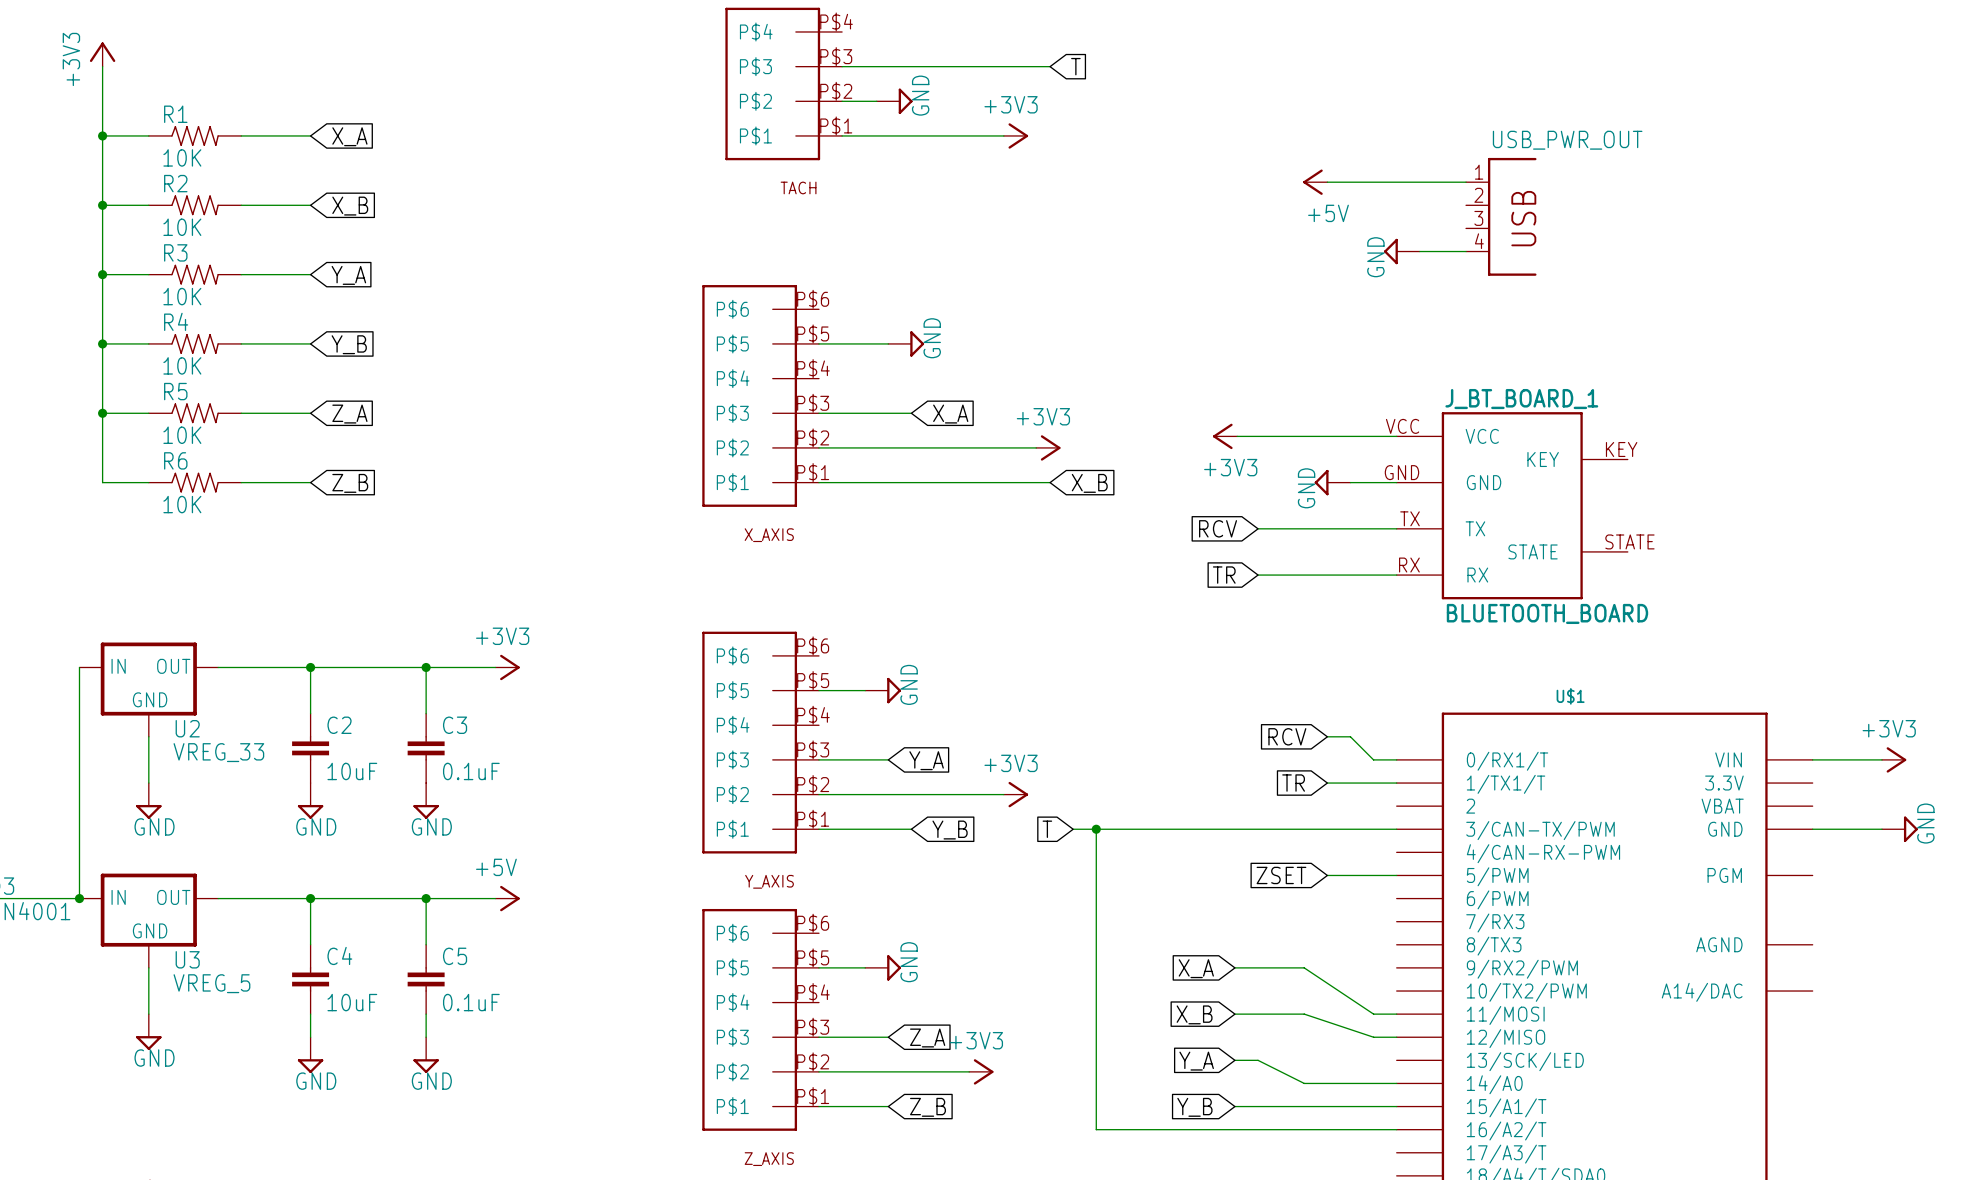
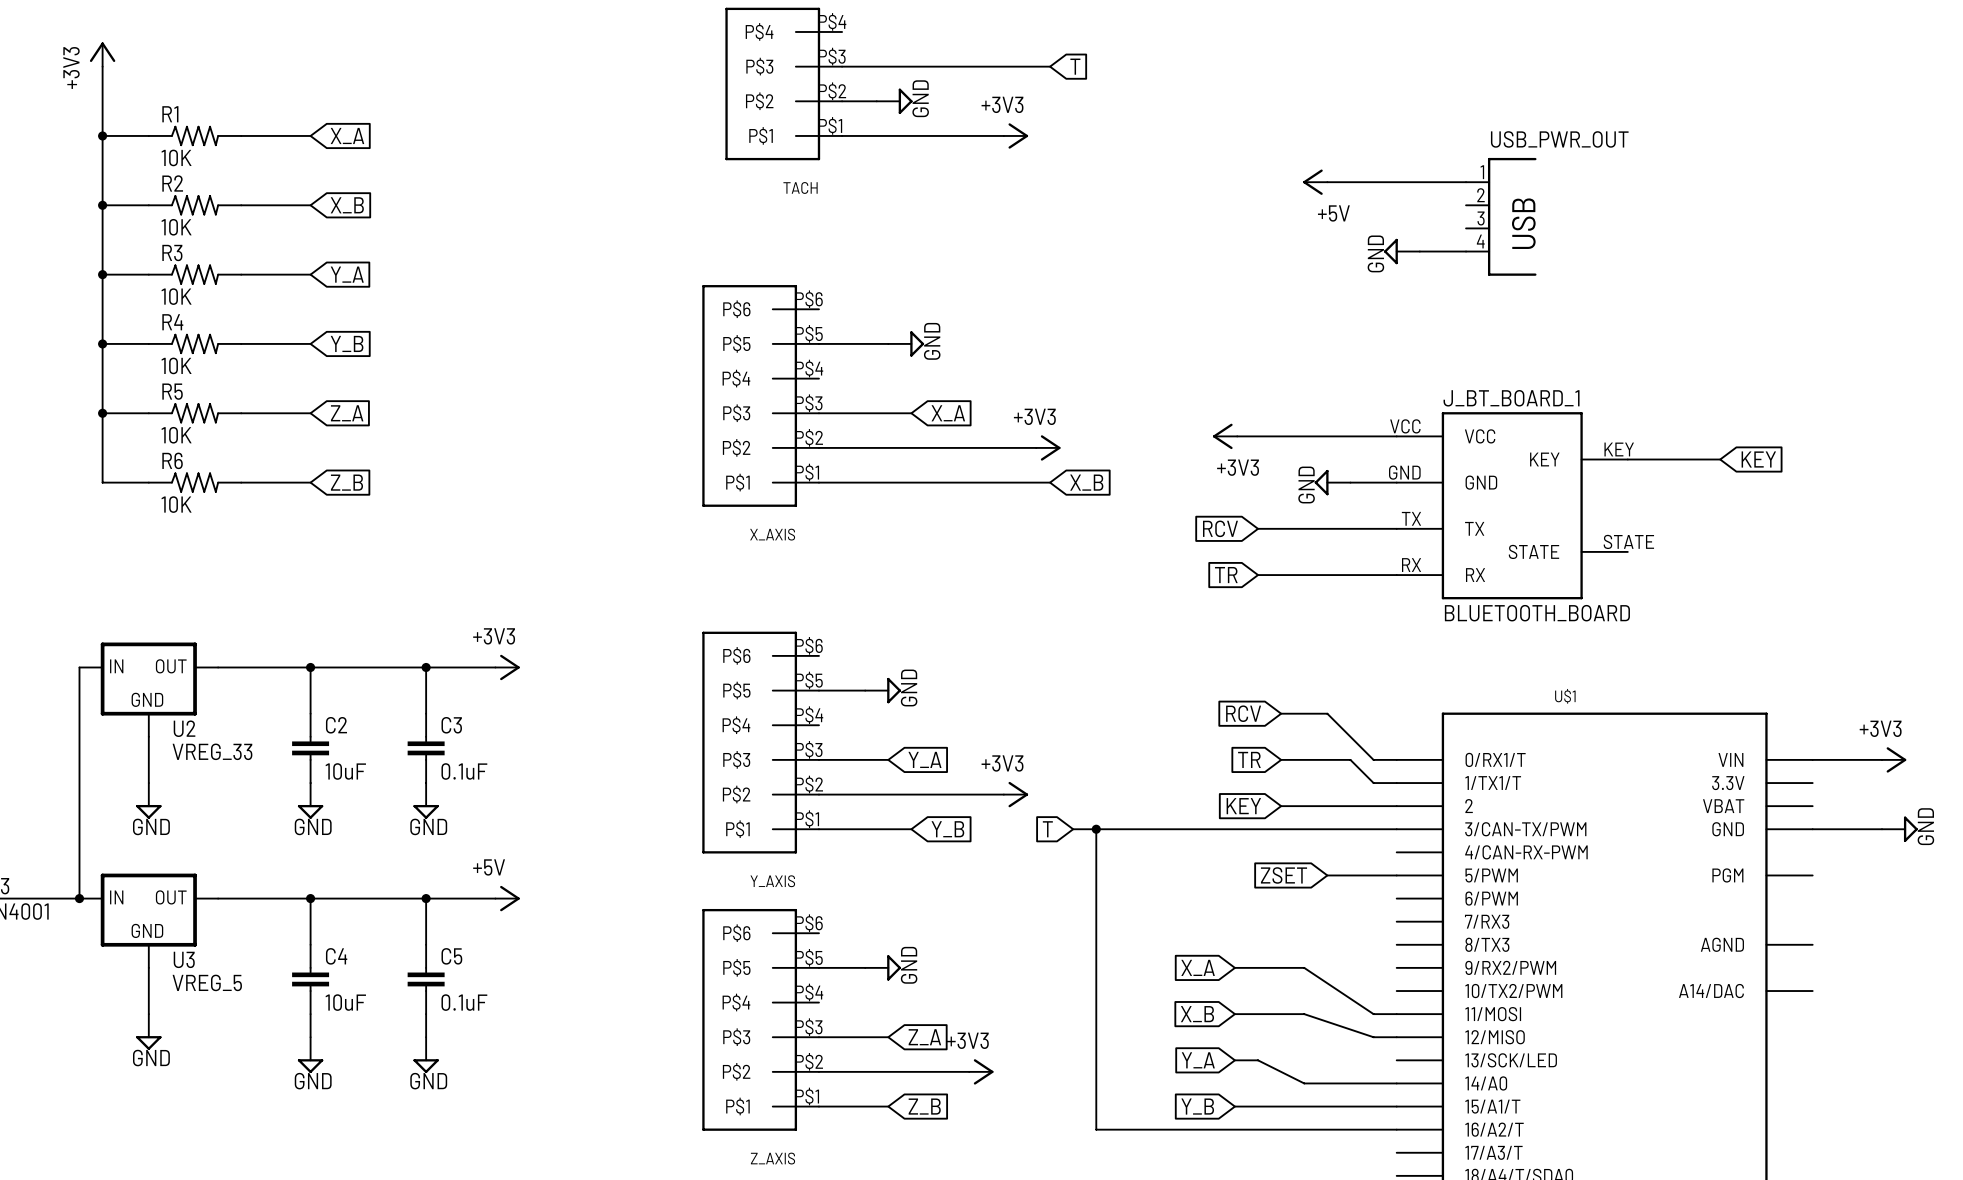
wire: none -> (1627, 459) (1720, 459)
global label: none -> KEY (1758, 459)
global label position: RCV (1287, 736) -> RCV (1243, 713)
wire: (1327, 736) (1350, 736) -> (1281, 713) (1327, 713) (1350, 736)
global label position: TR (1293, 783) -> TR (1249, 759)
wire: (1327, 783) (1373, 783) -> (1281, 759) (1350, 759) (1373, 783)
global label: none -> KEY (1243, 806)
wire: none -> (1281, 806) (1396, 806)

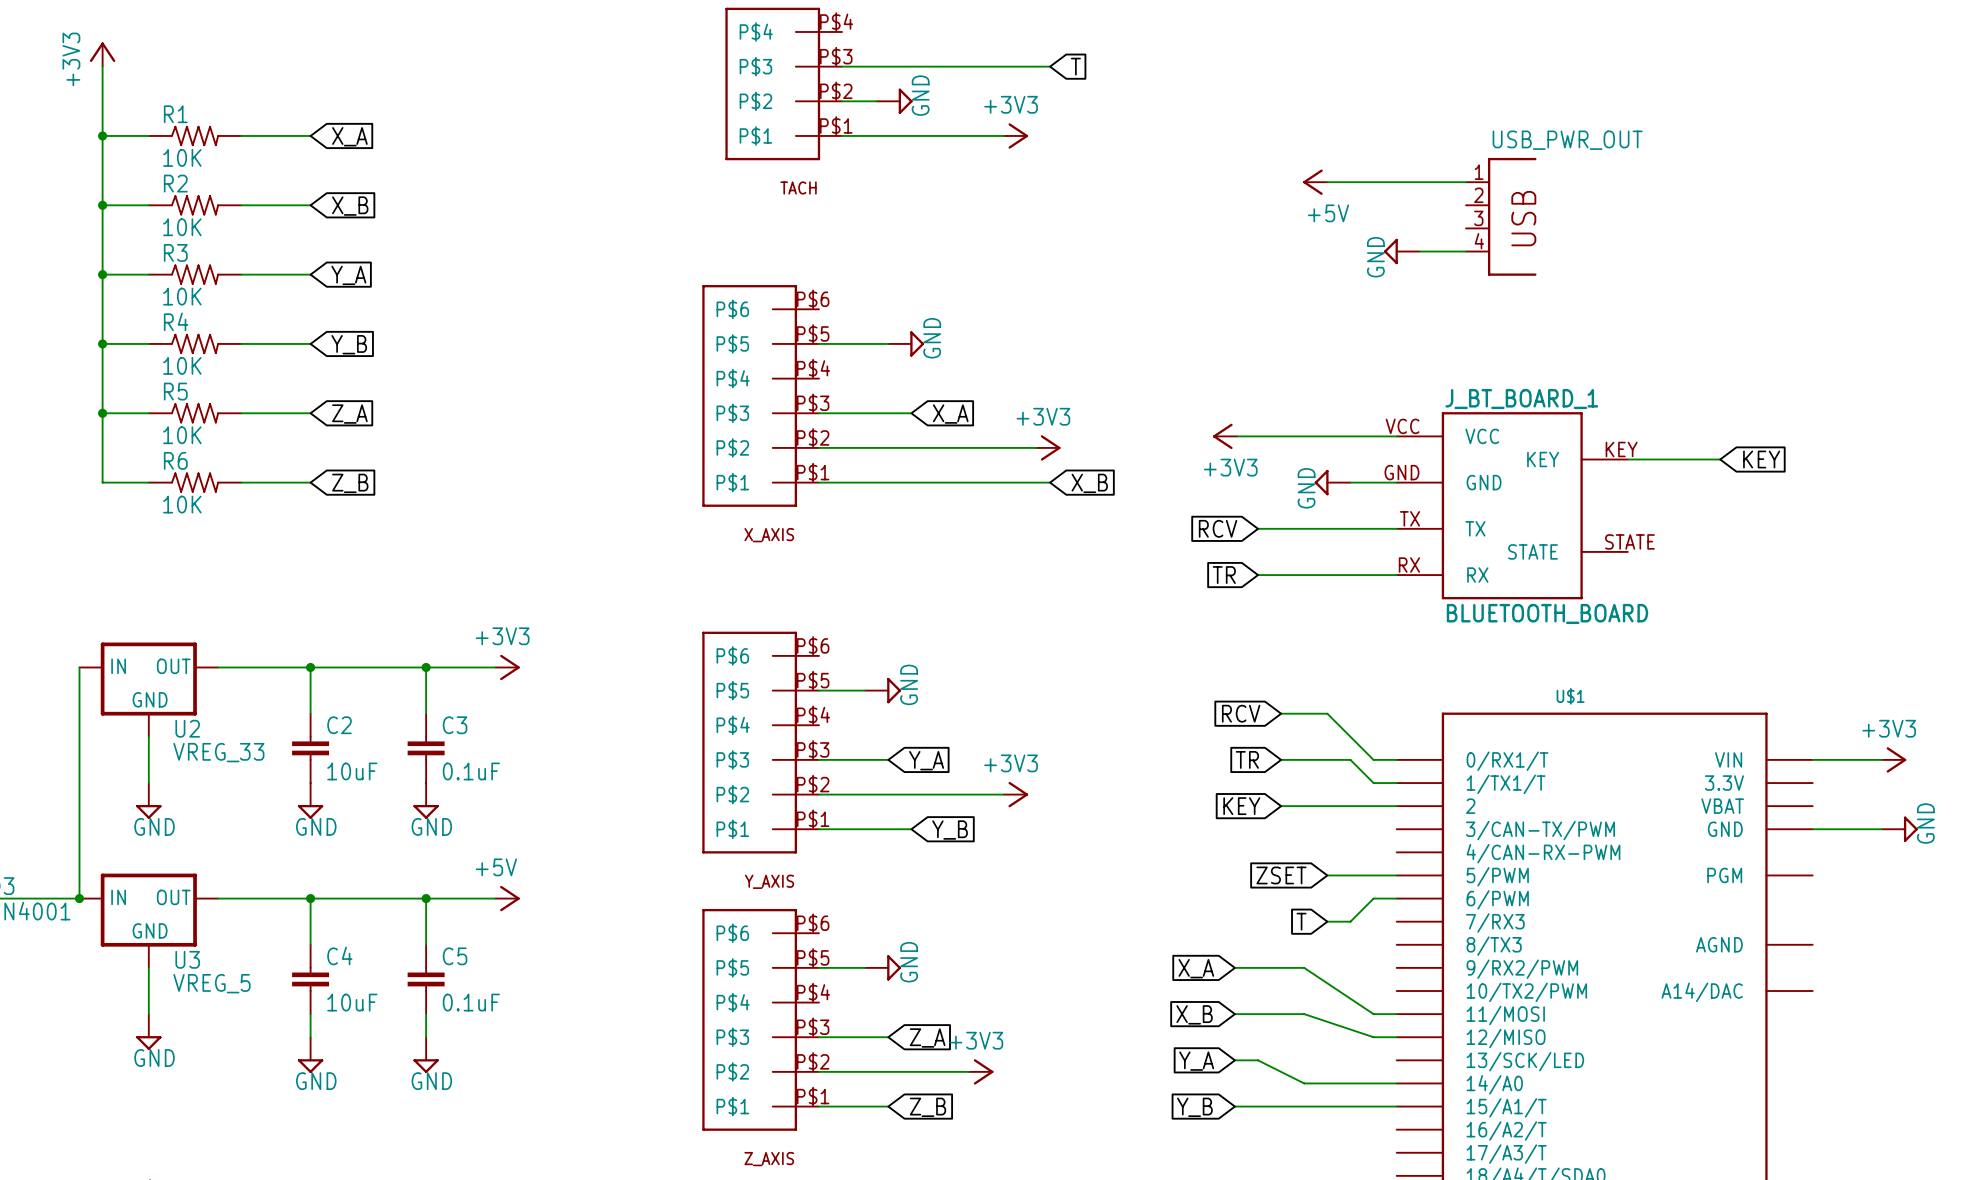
global label: T (1047, 829) -> none
wire: (1073, 829) (1396, 829) -> none
wire: (1096, 829) (1096, 1129) (1396, 1129) -> none
junction: (1096, 829) -> none
wire: none -> (1396, 898) (1373, 898) (1350, 921) (1327, 921)
global label: none -> T (1301, 921)

